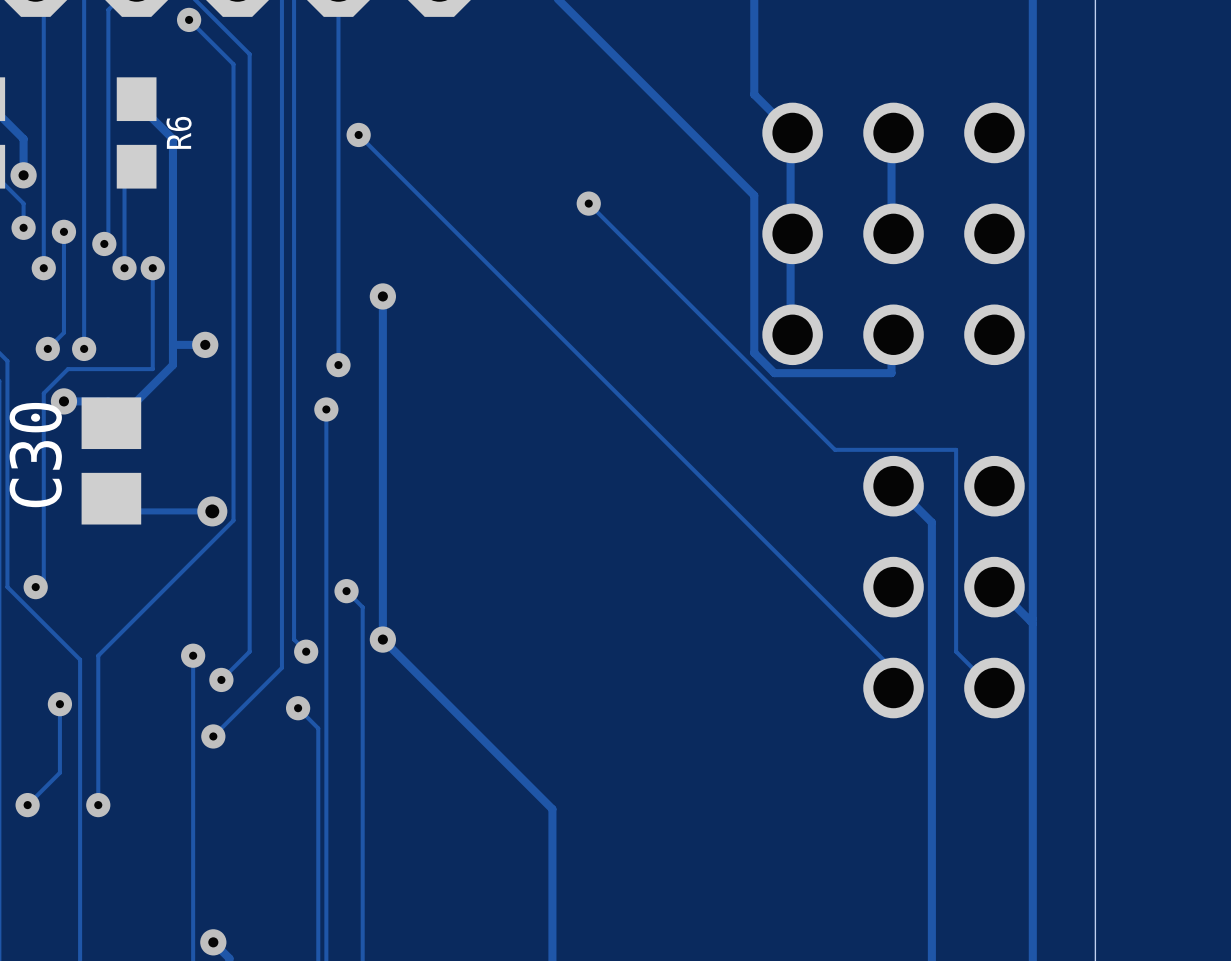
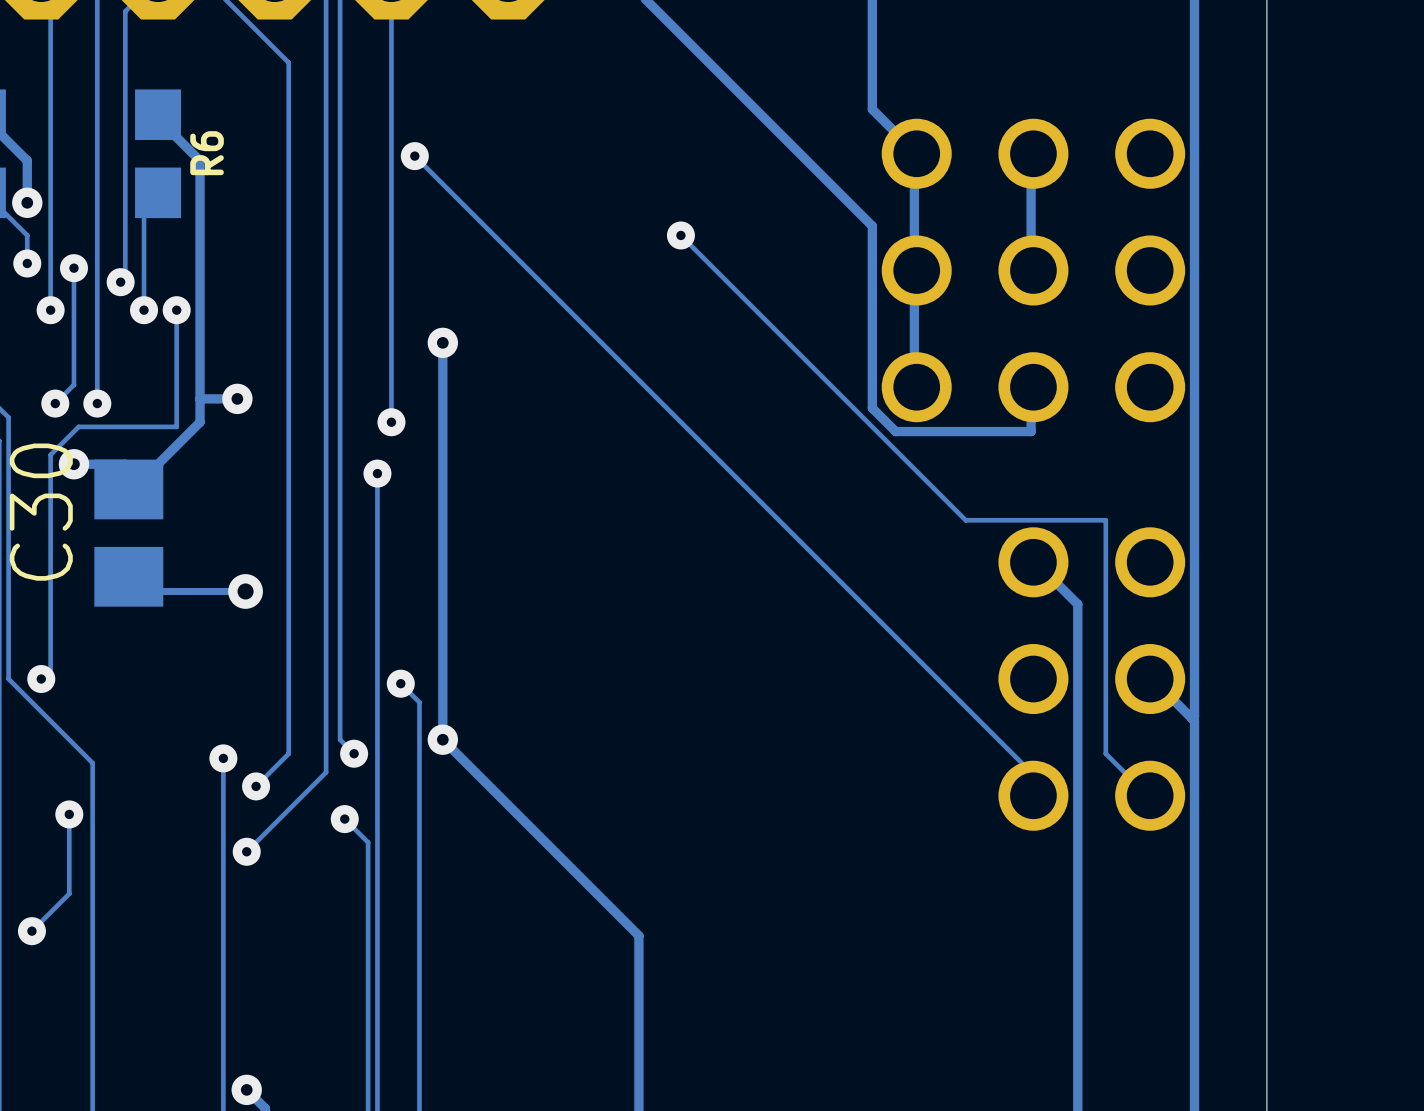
track: (189, 19) (233, 64) (233, 520) (98, 655) (98, 805) -> none
via: (189, 19) -> none
via: (98, 805) -> none

